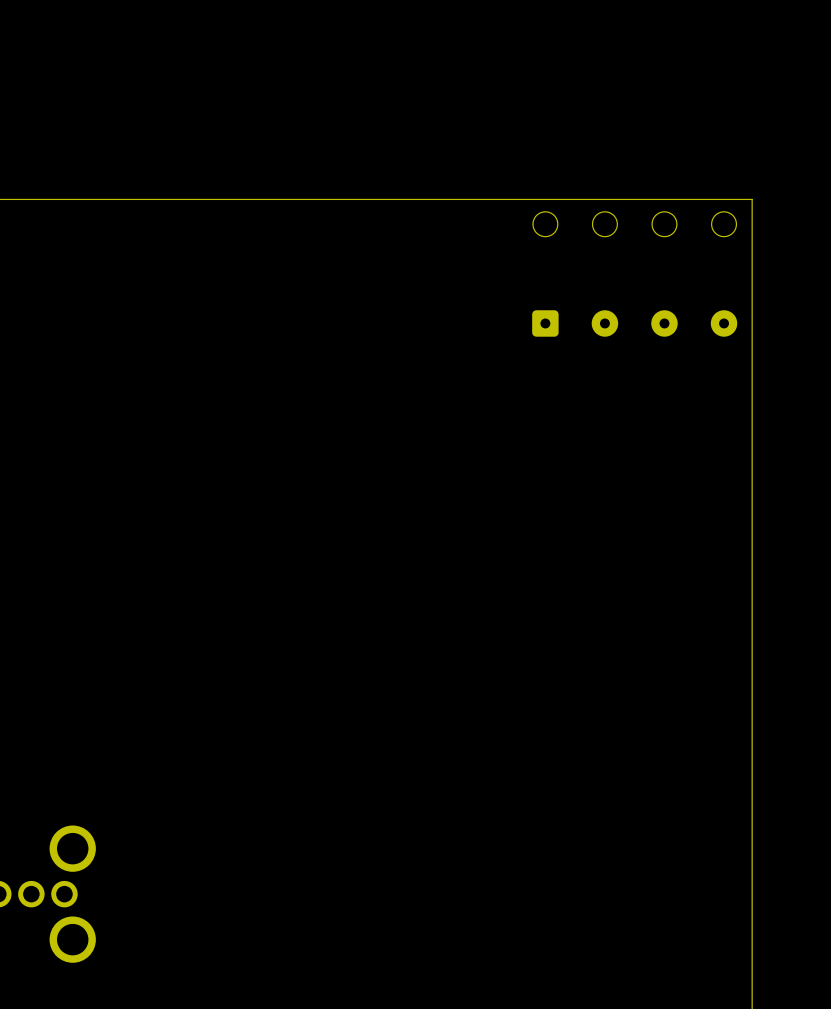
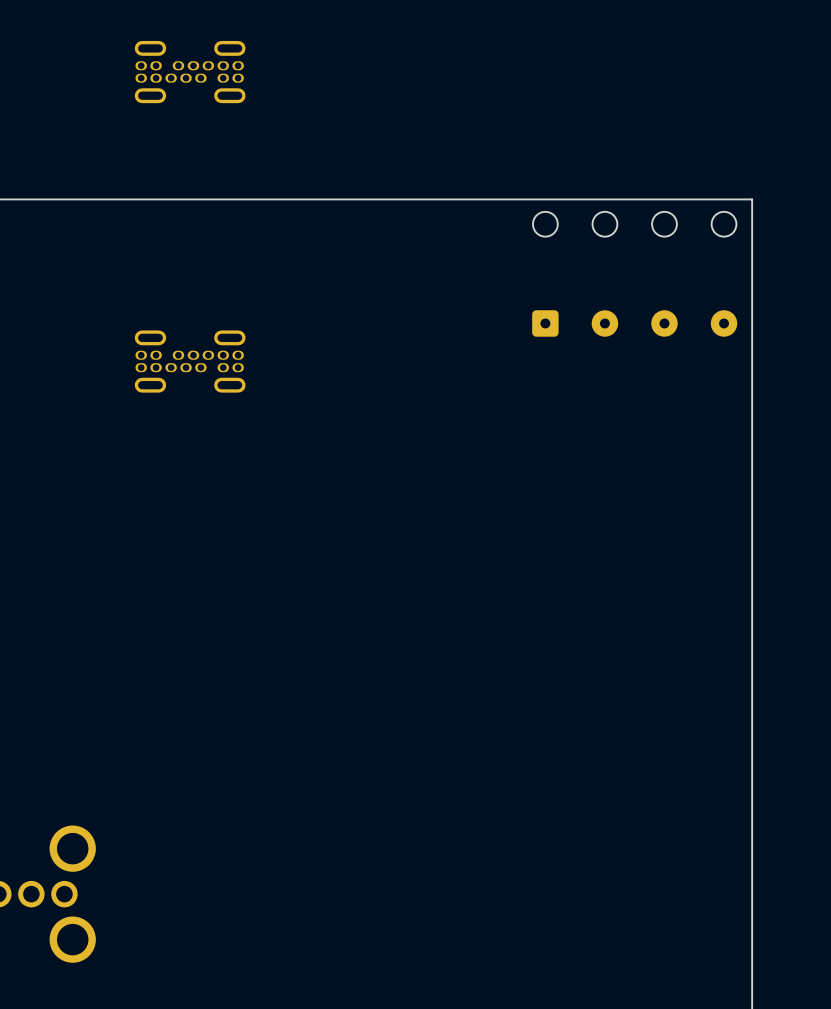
part: none -> (190, 72)
part: none -> (190, 361)

